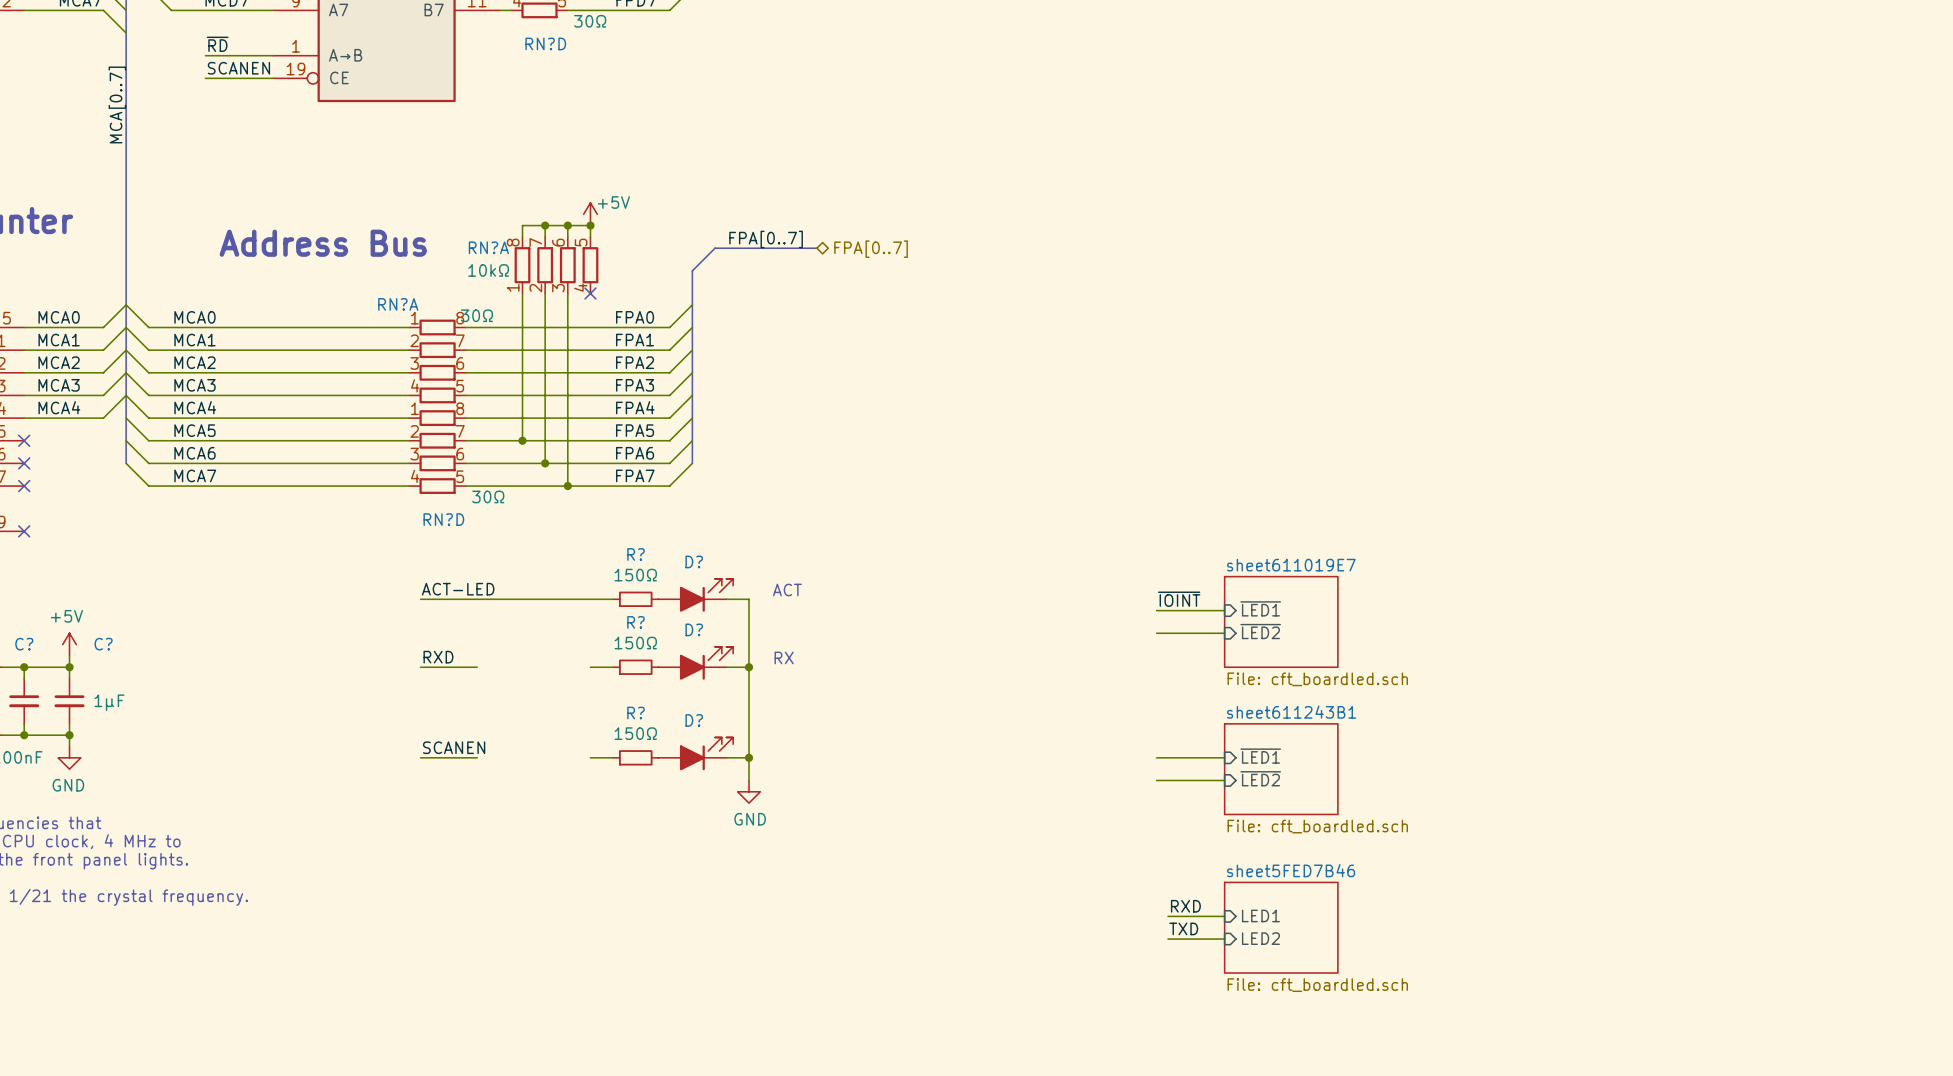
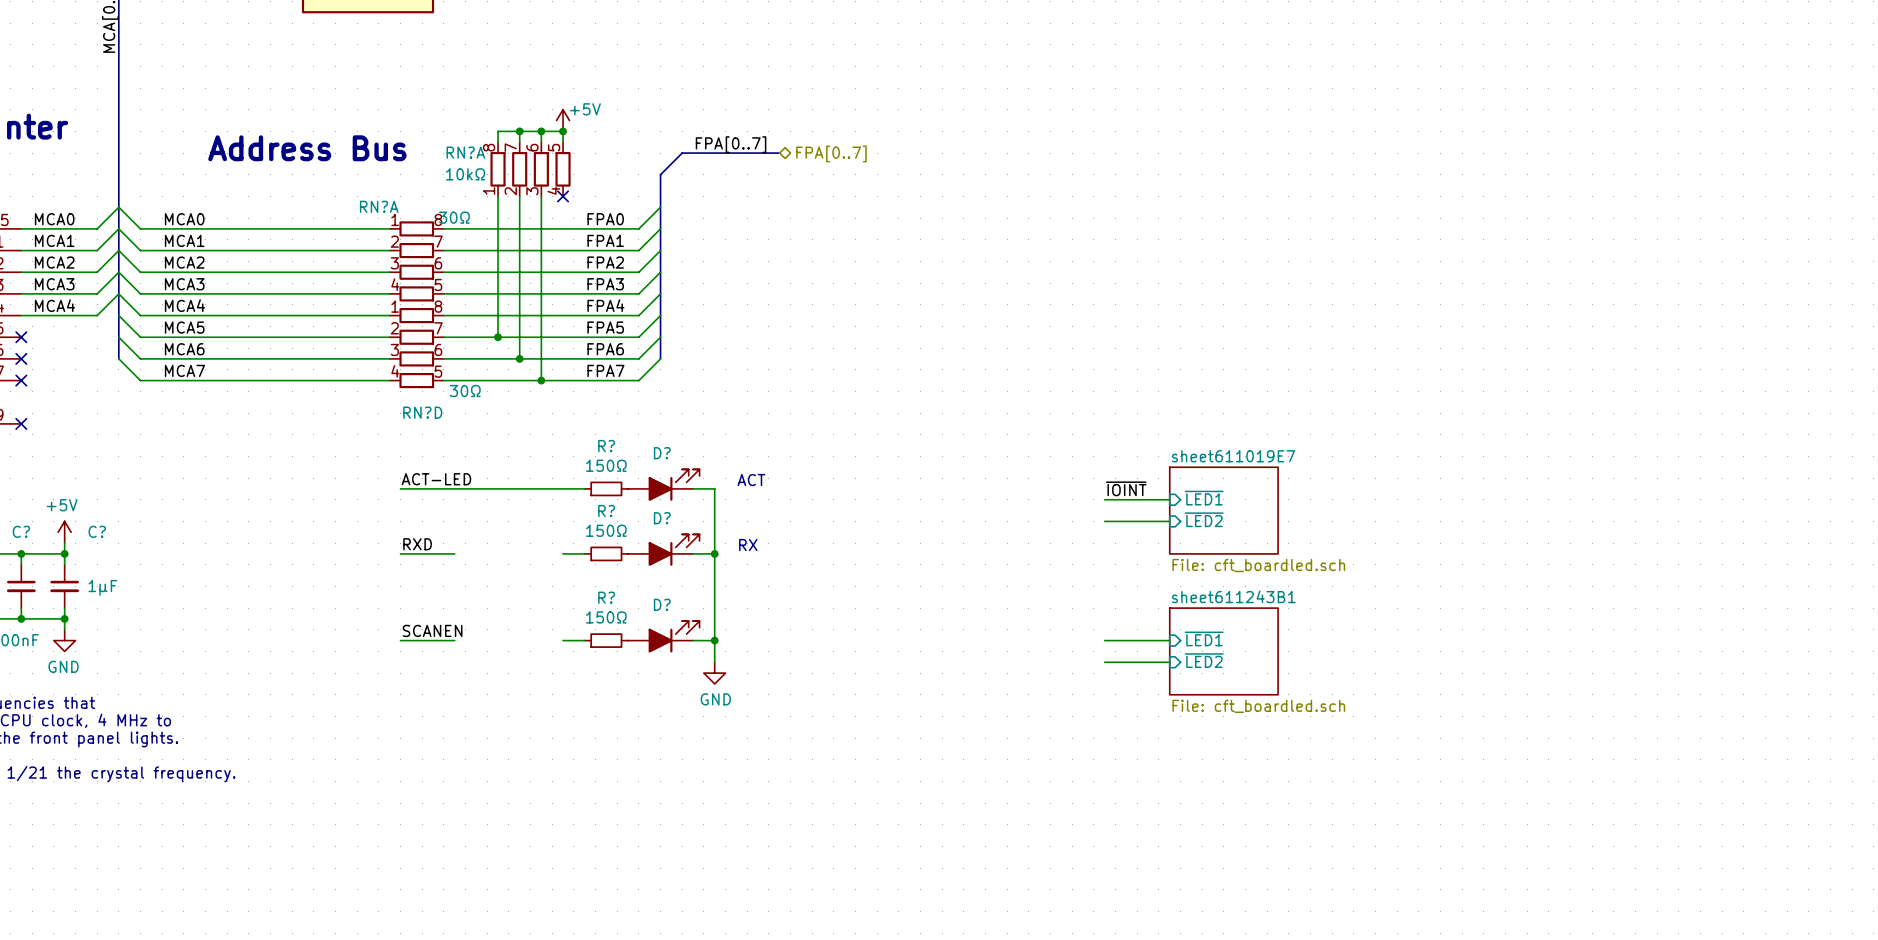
label: RXD (1185, 906) -> none
sheet pin: LED1 (1260, 915) -> none
wire: (1168, 916) (1224, 916) -> none
sheet sheet5FED7B46: File: cft_boardled.sch (1281, 927) -> none
label: TXD (1183, 928) -> none
sheet pin: LED2 (1260, 938) -> none
wire: (1168, 939) (1224, 939) -> none

